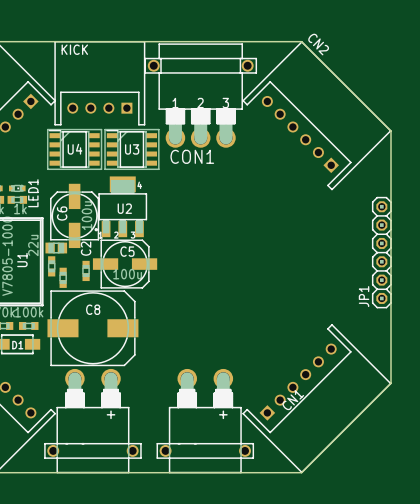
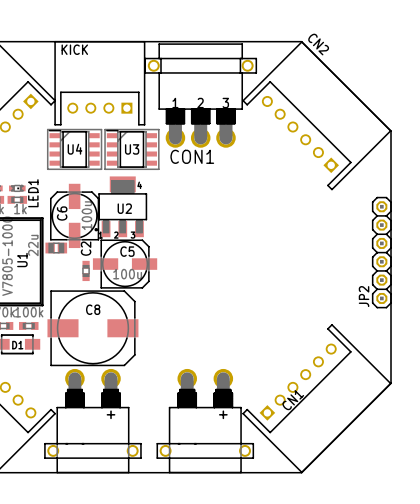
part: (51, 266) -> none
part: (63, 277) -> none
JP1 name: JP1 (364, 296) -> JP2 (364, 296)

